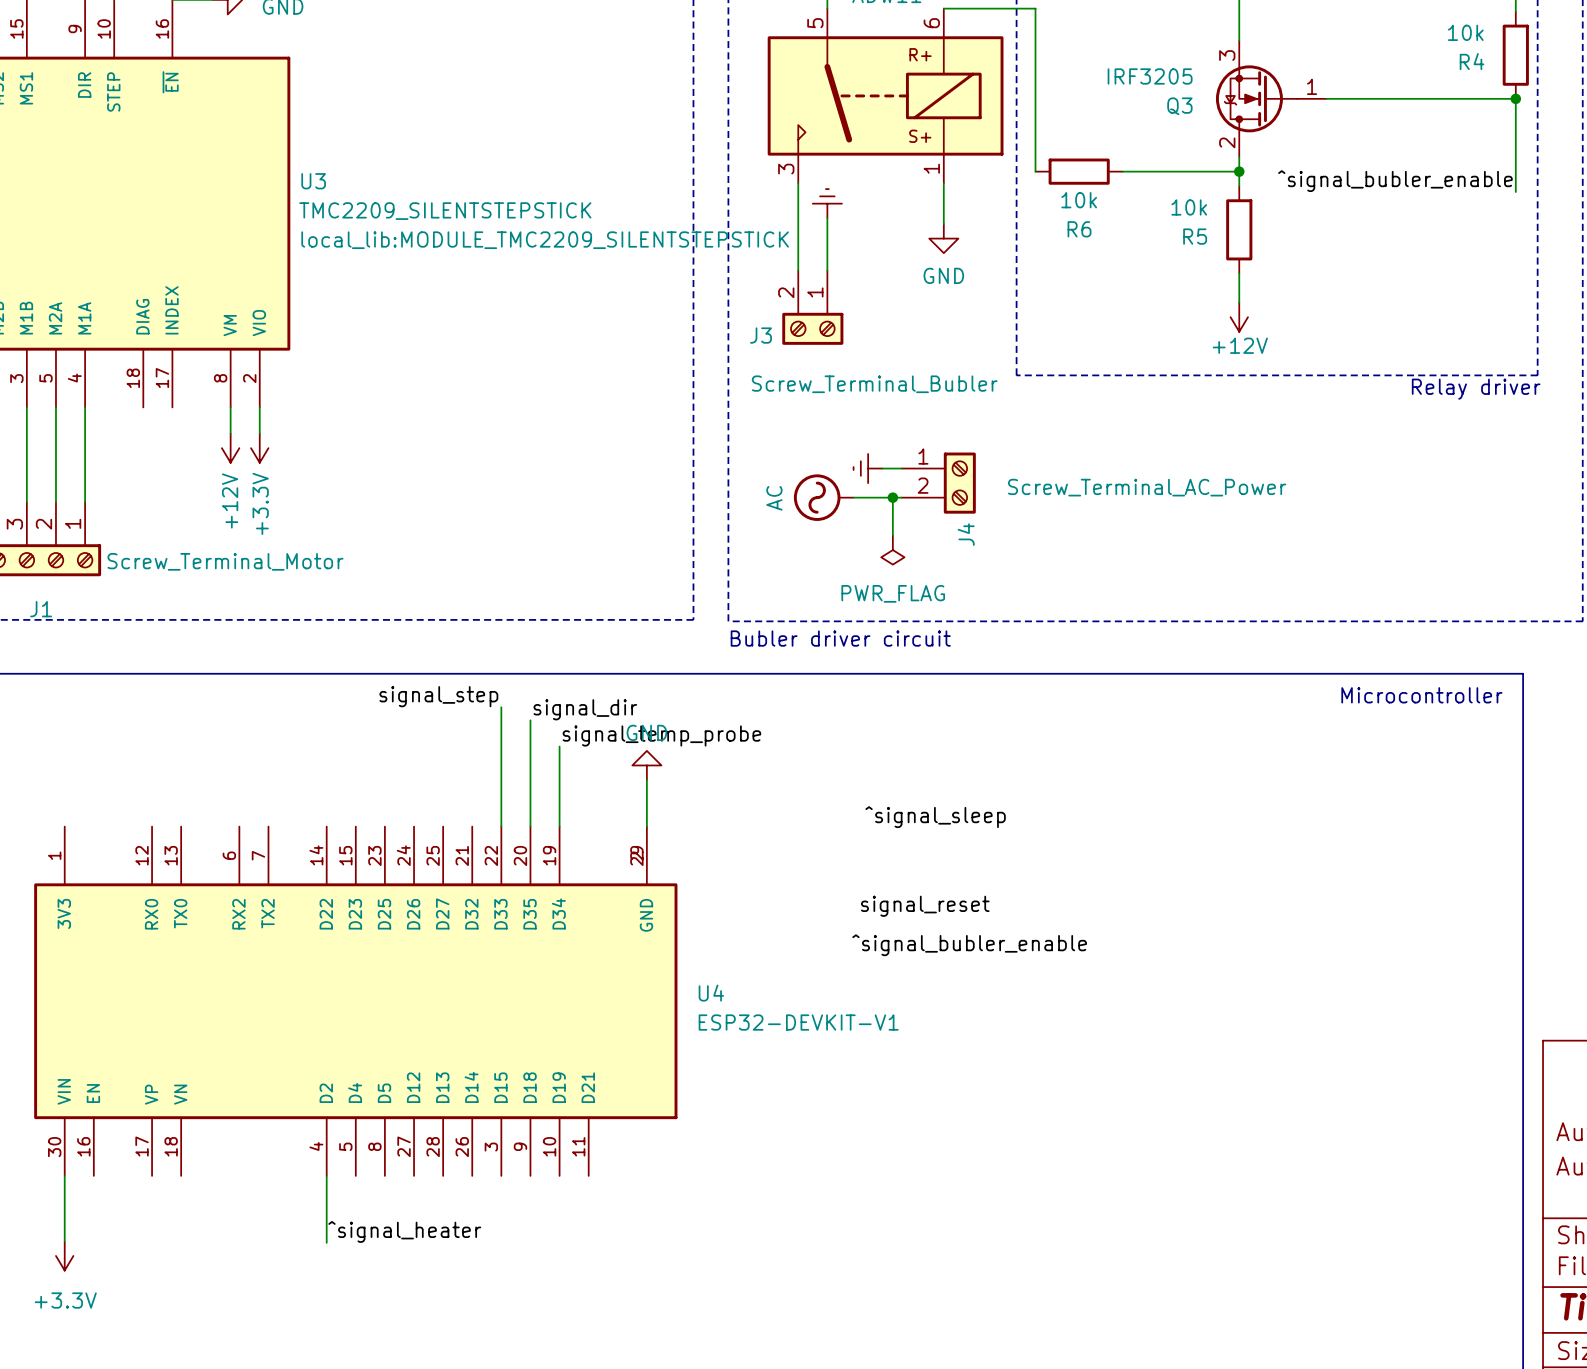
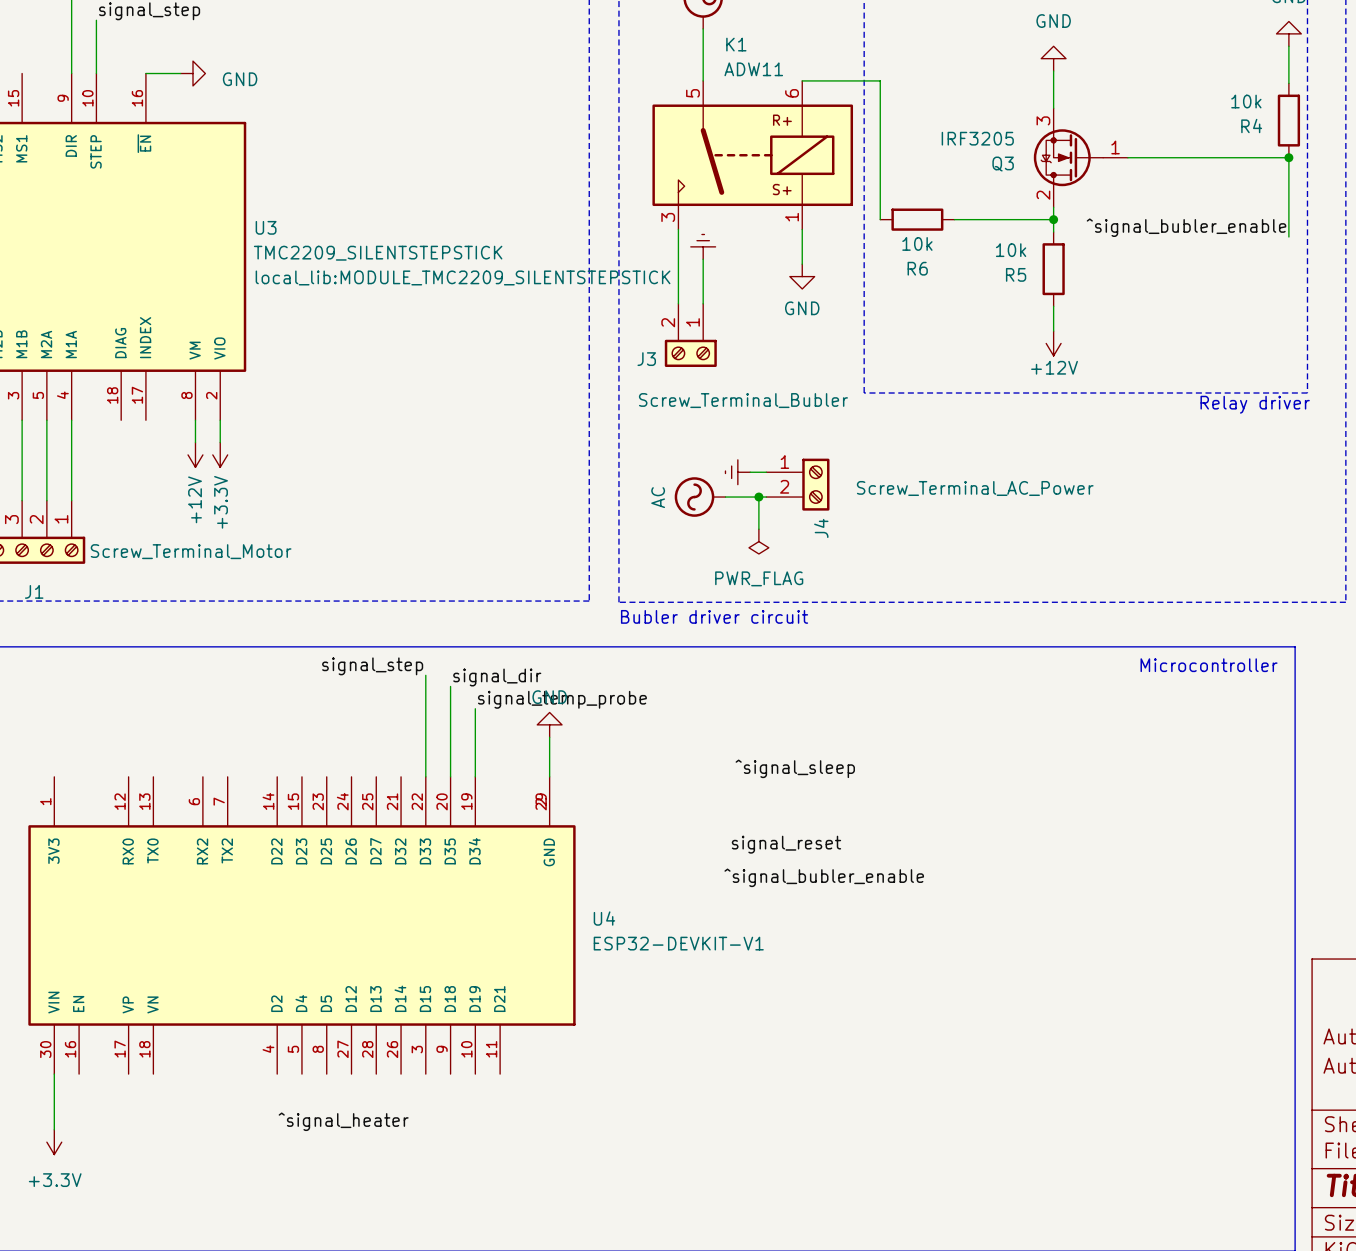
wire: (326, 1175) (326, 1242) -> none

